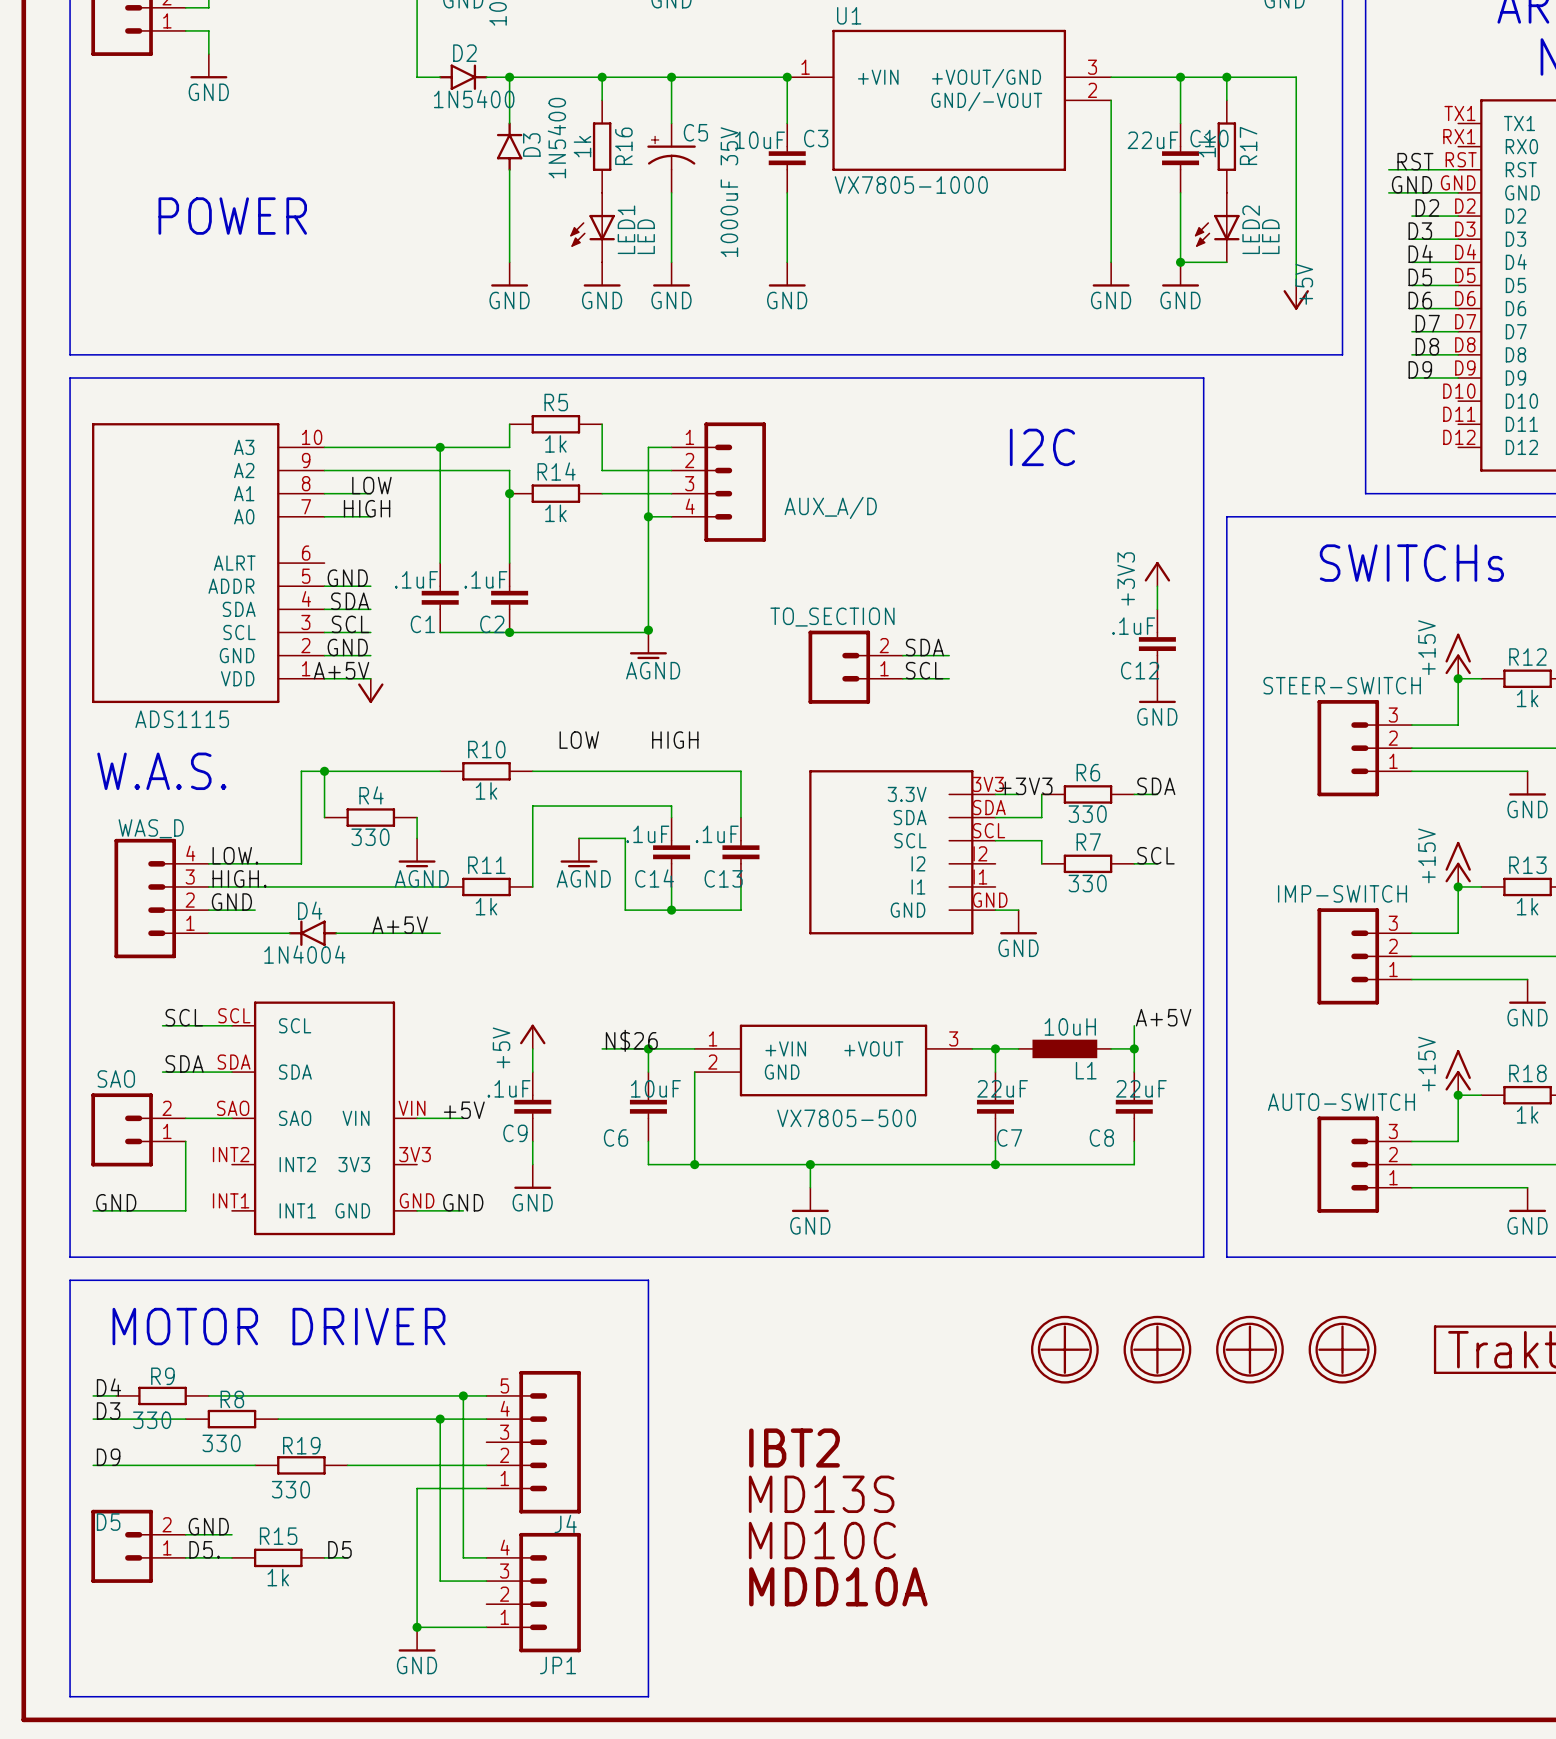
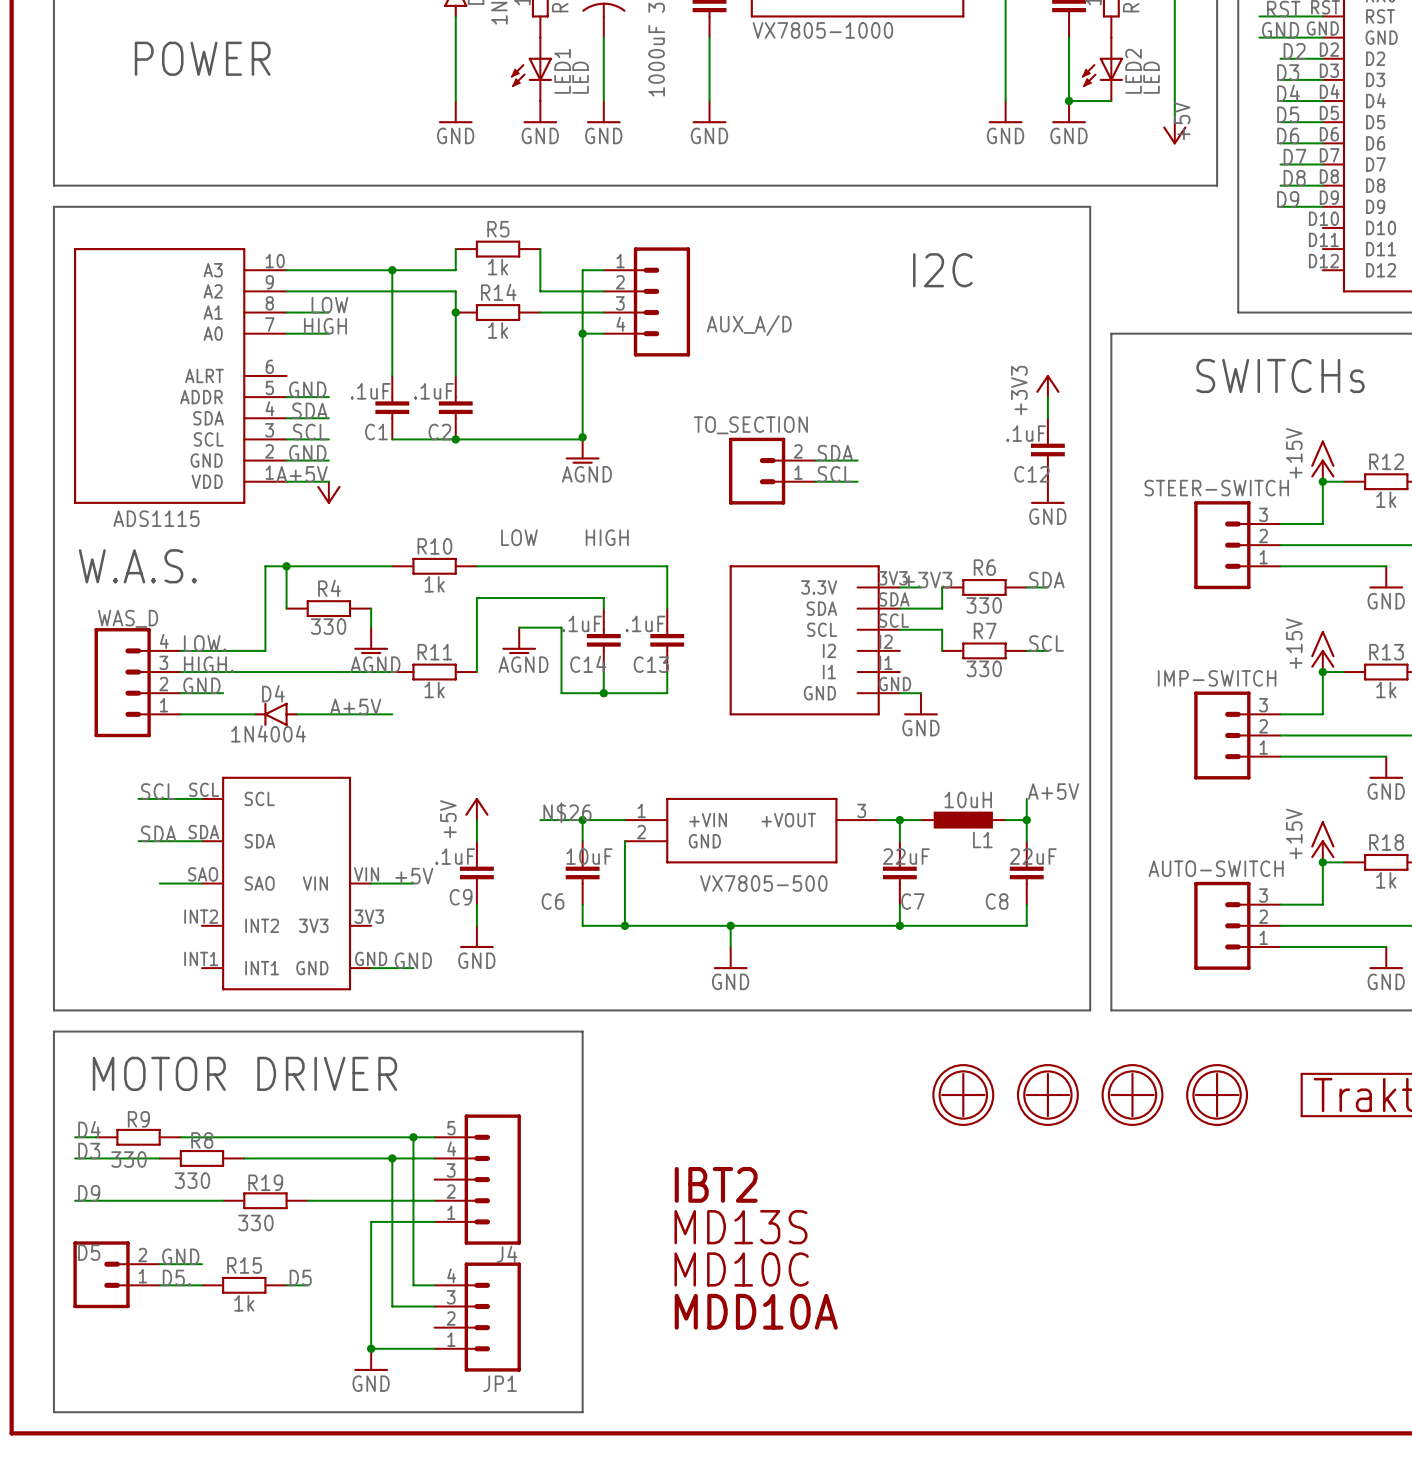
SAO: (138, 1129) -> none
wire: (185, 1141) (185, 1210) (93, 1210) -> none
label: GND (116, 1202) -> none

